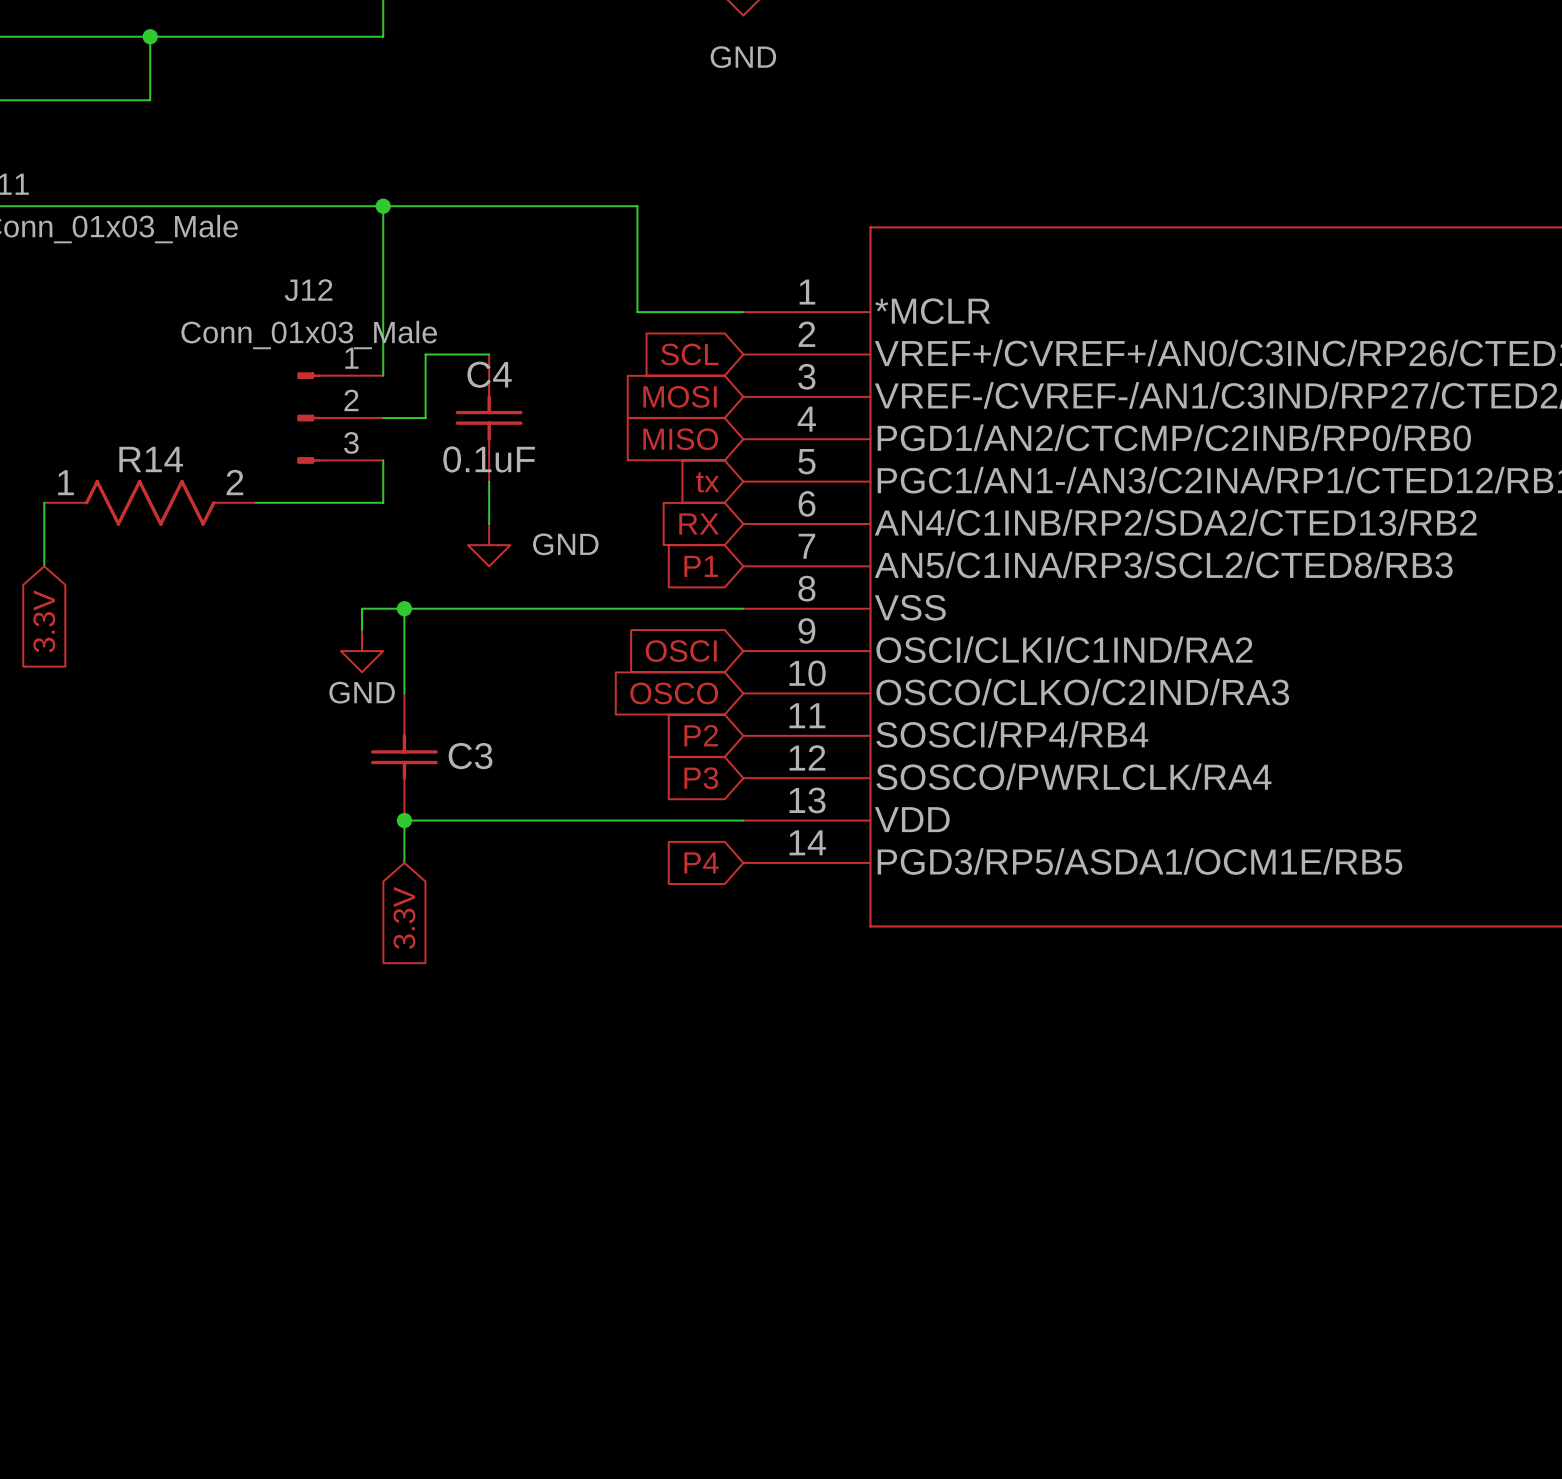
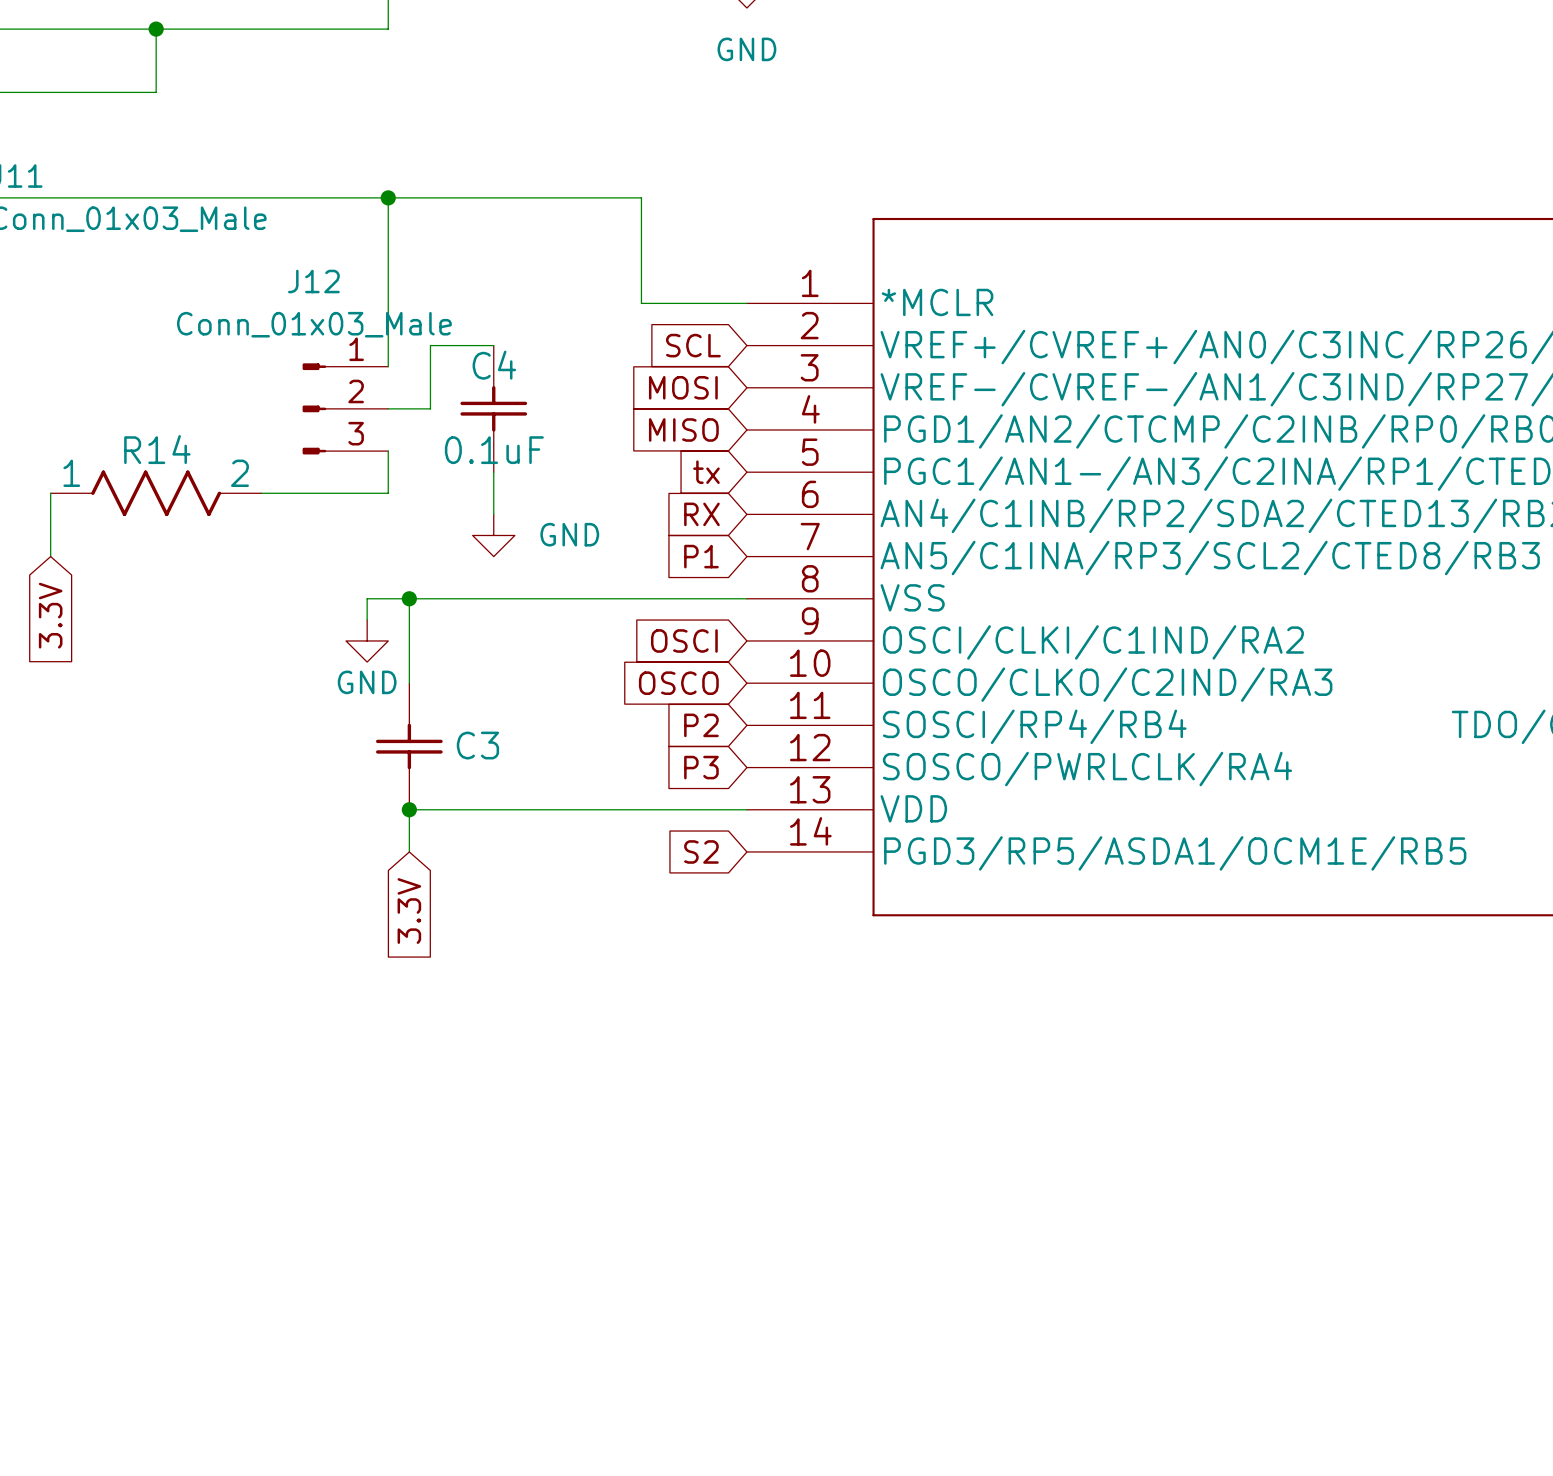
global label: P4 (701, 862) -> S2 (701, 851)

